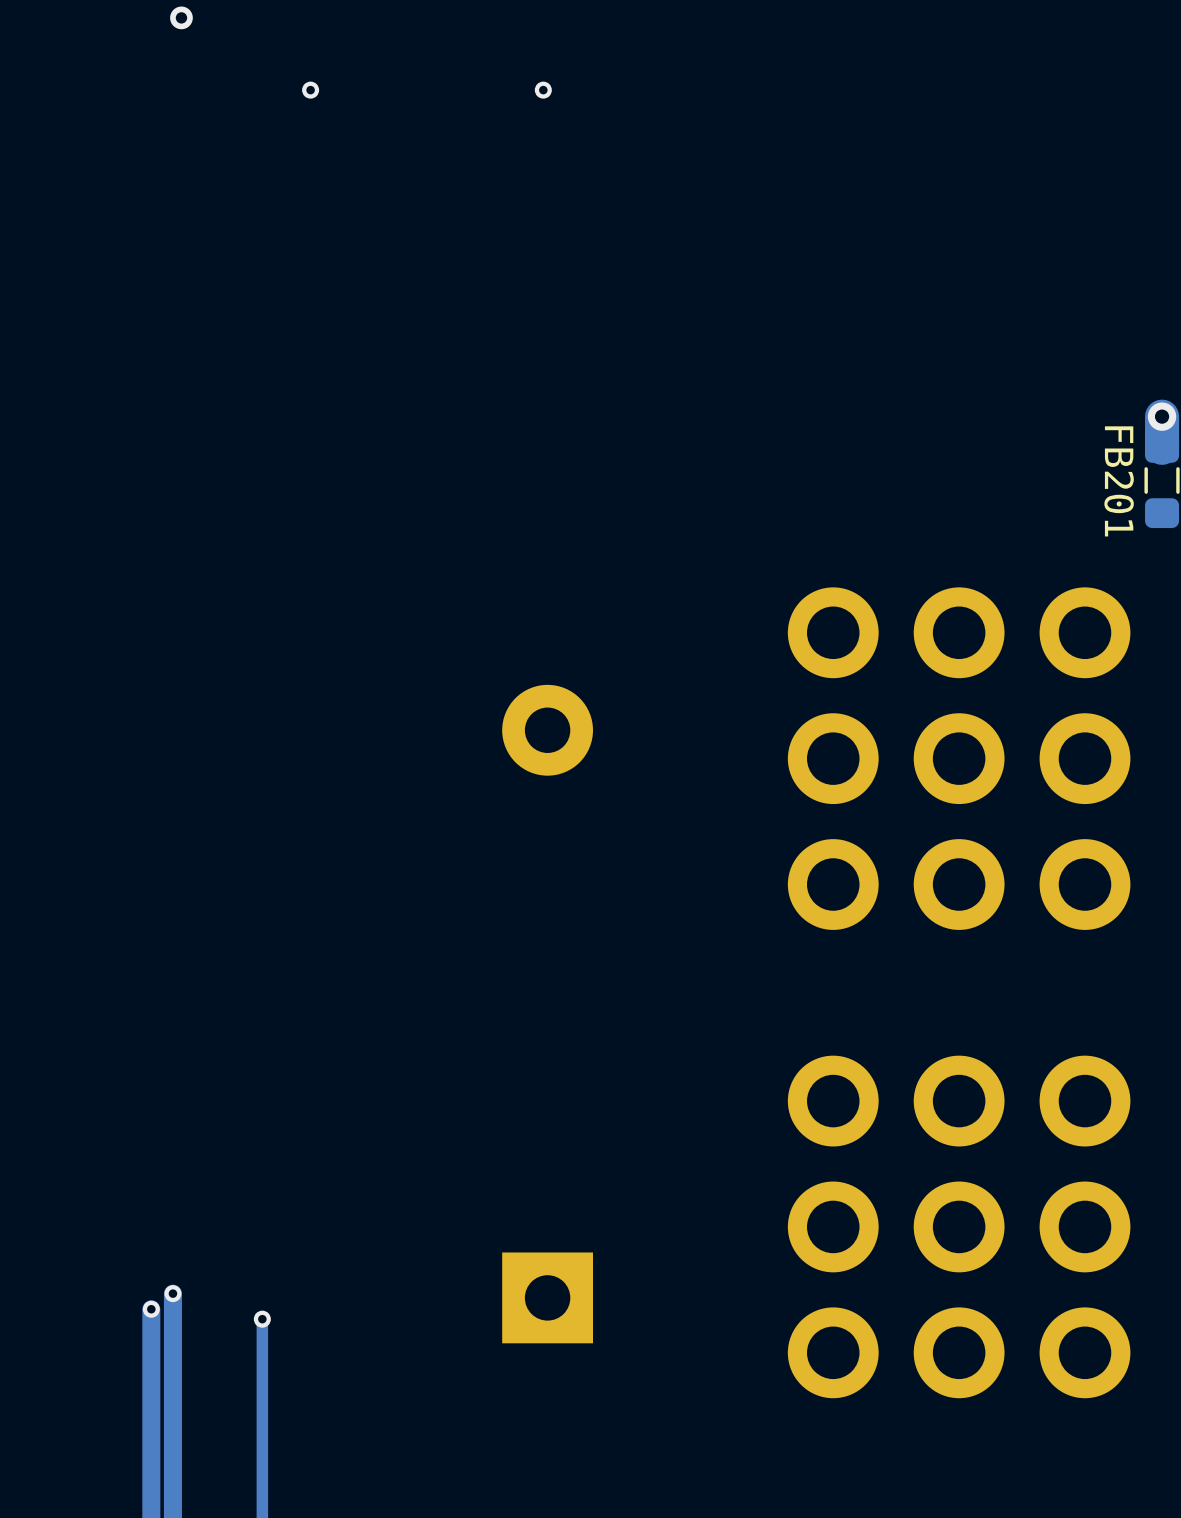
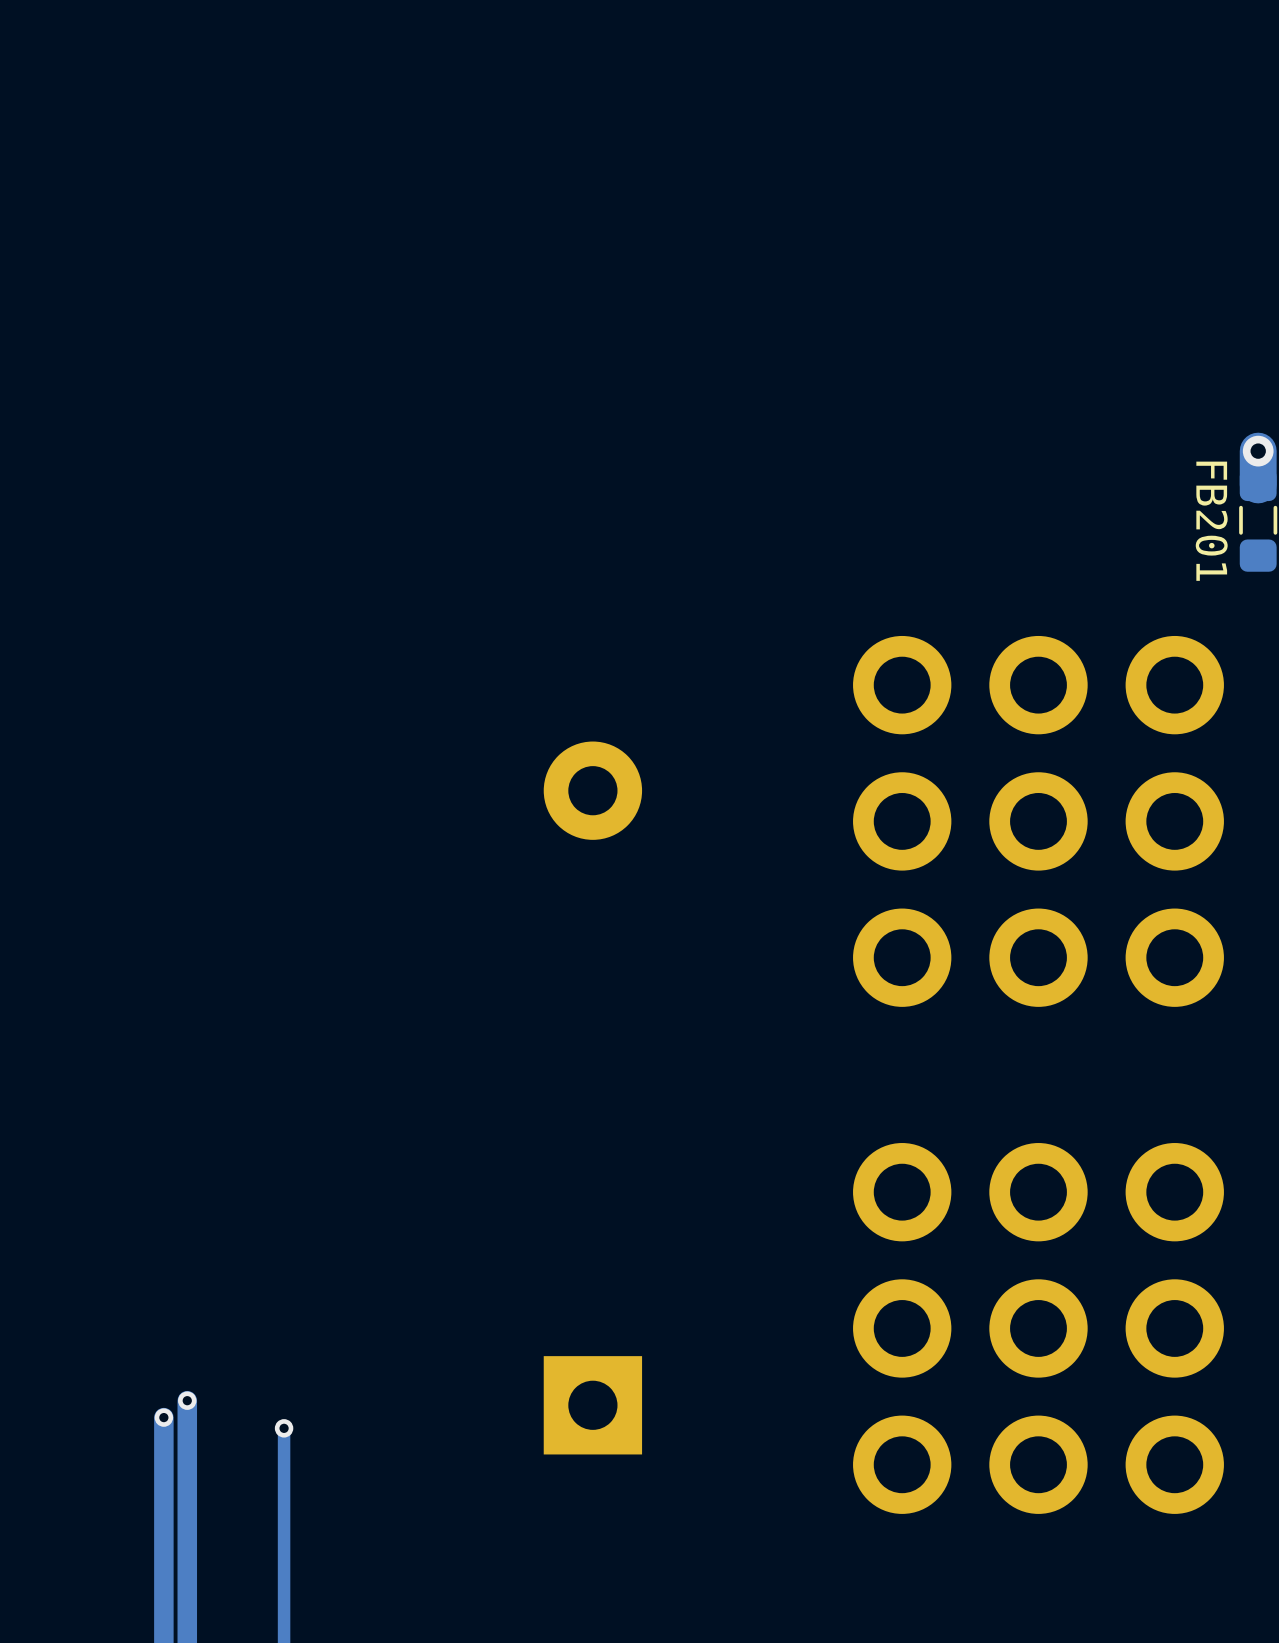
via: (181, 17) -> none
via: (310, 90) -> none
via: (543, 90) -> none

